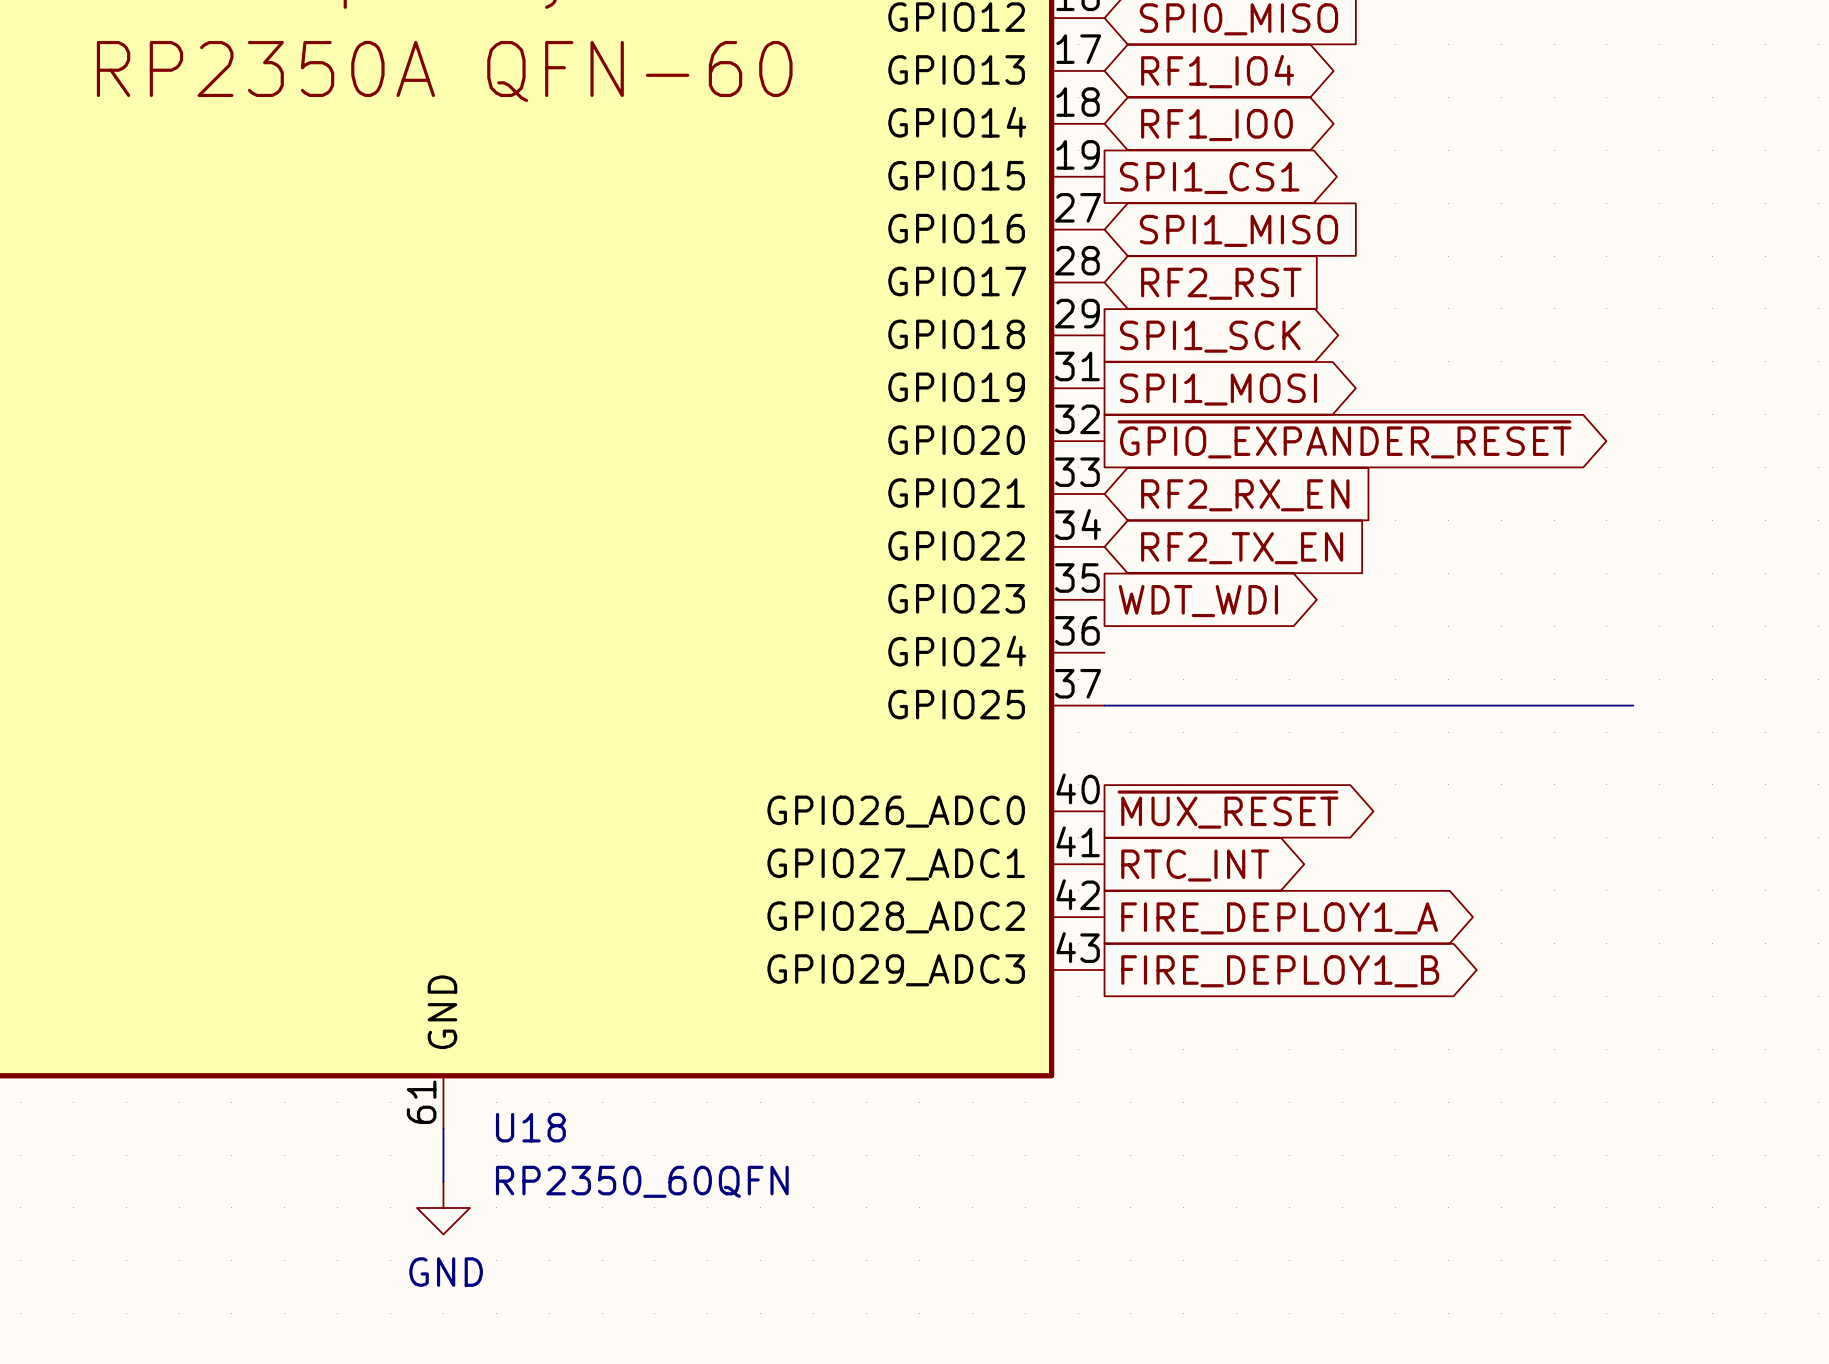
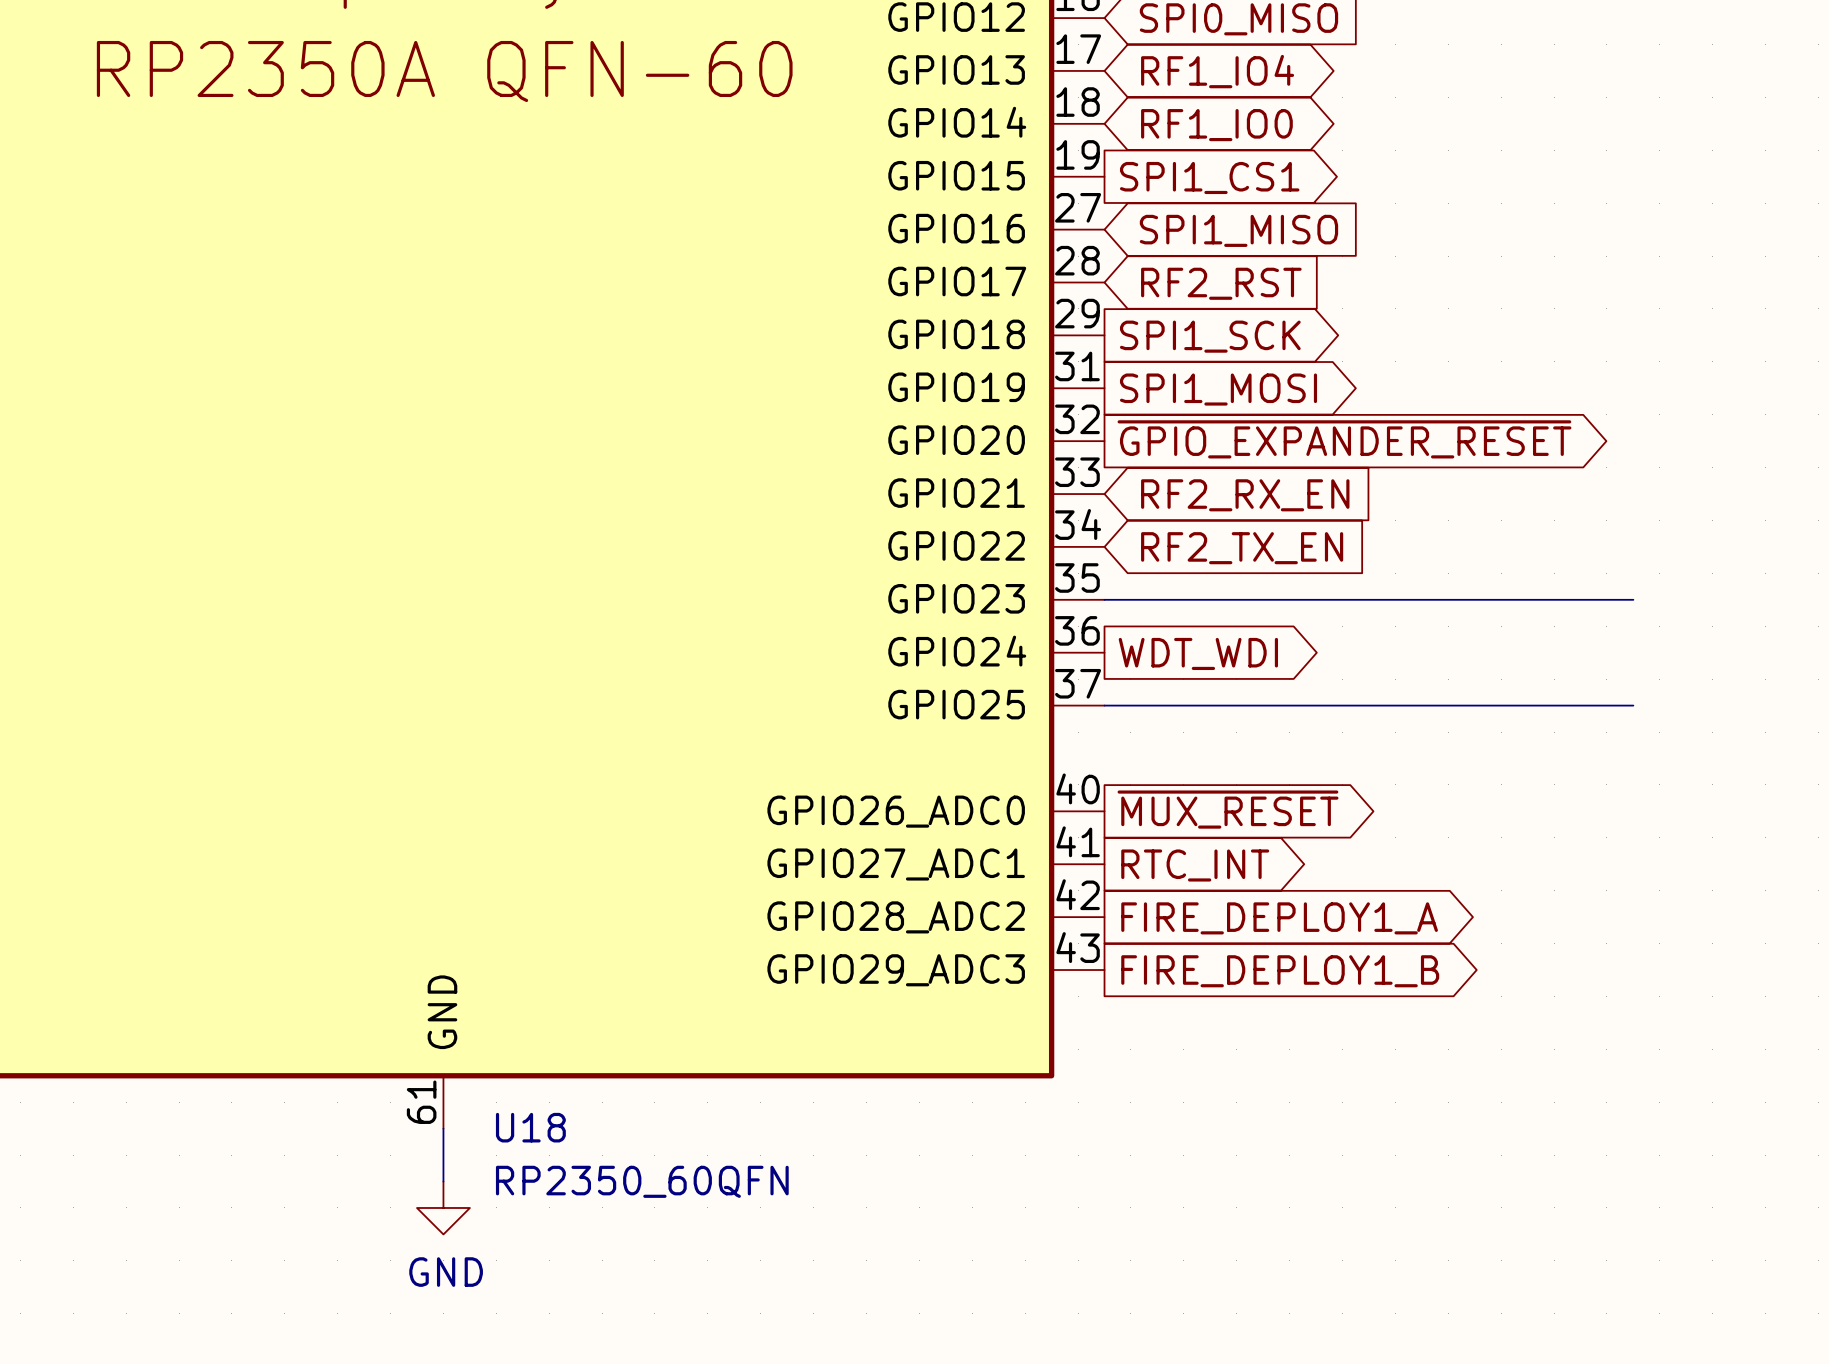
wire: none -> (1104, 599) (1633, 599)
global label position: WDT_WDI (1198, 601) -> WDT_WDI (1198, 653)

